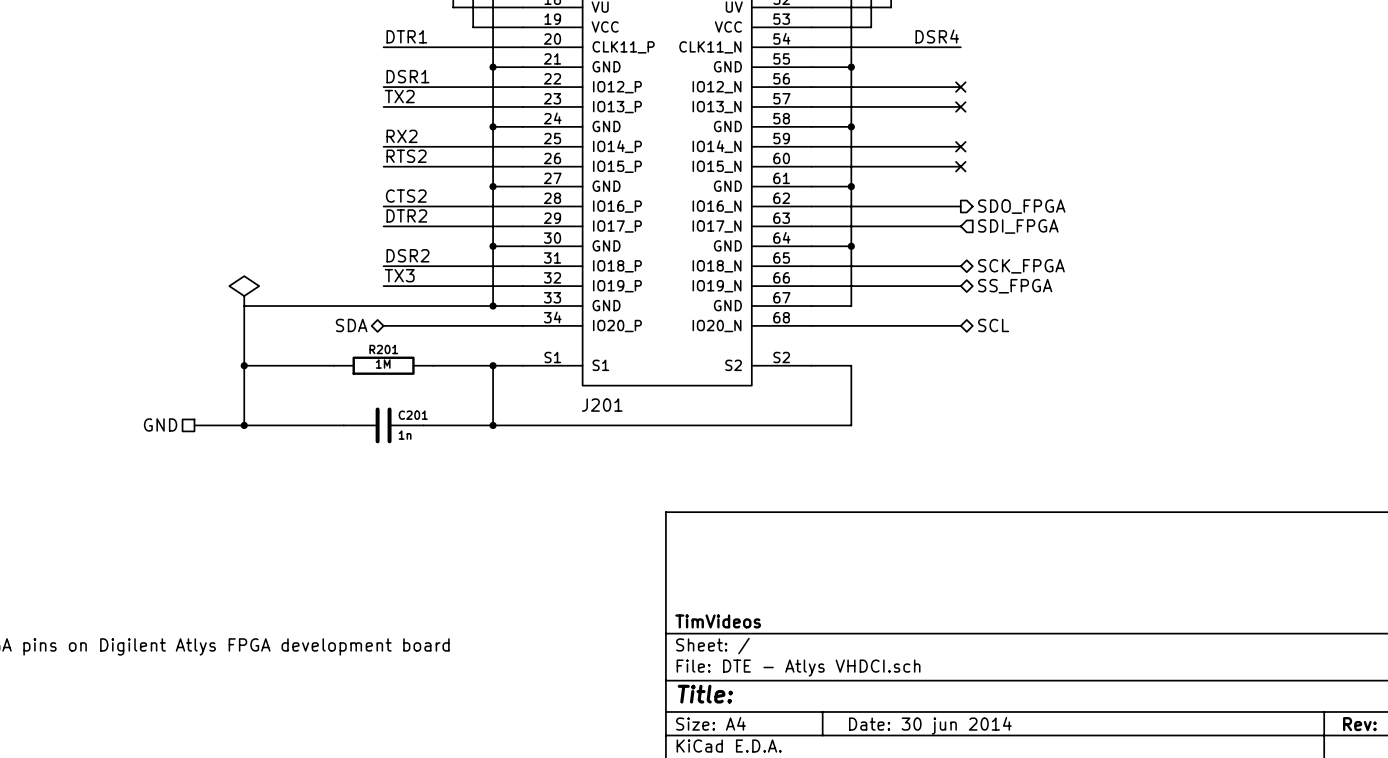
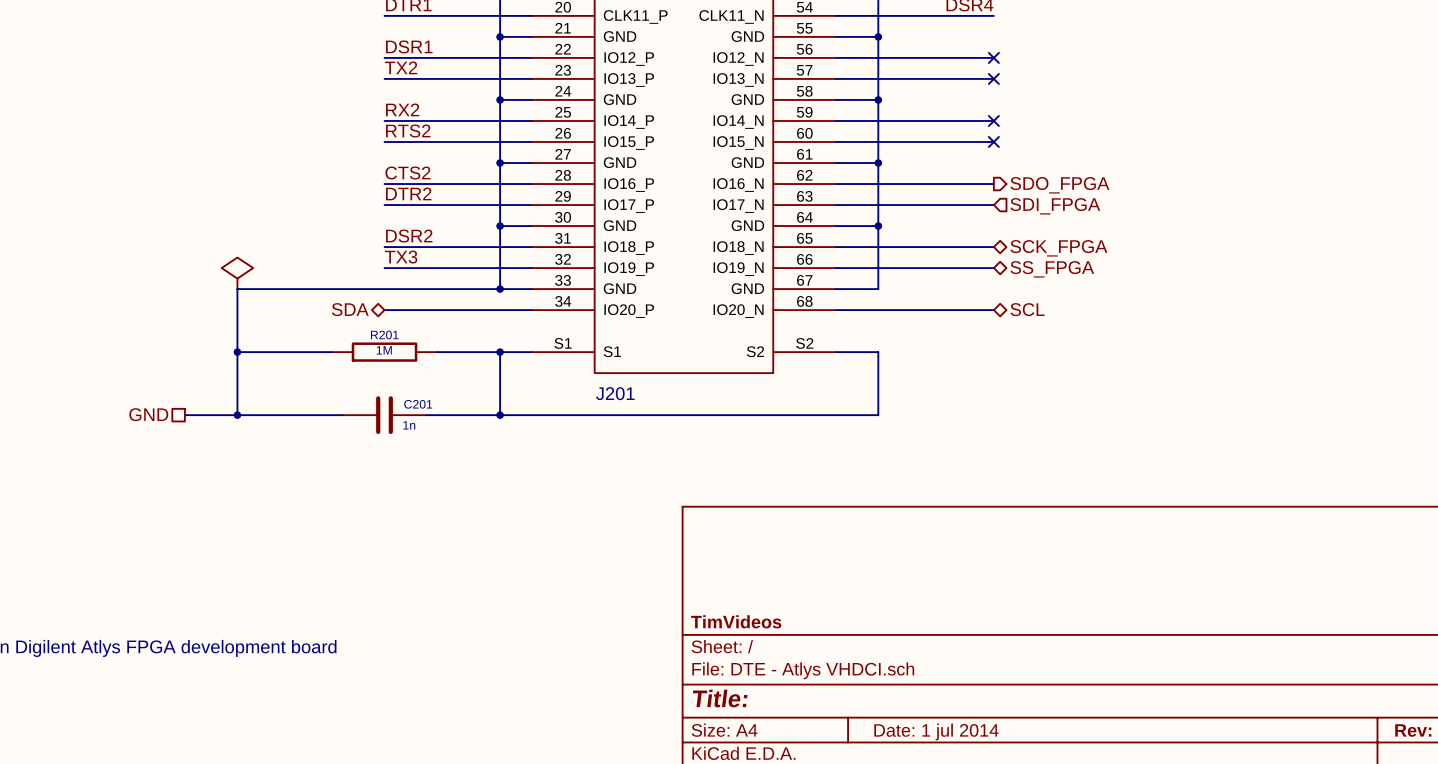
title block: Date: 30 jun 2014 (930, 725) -> Date: 1 jul 2014 (936, 731)

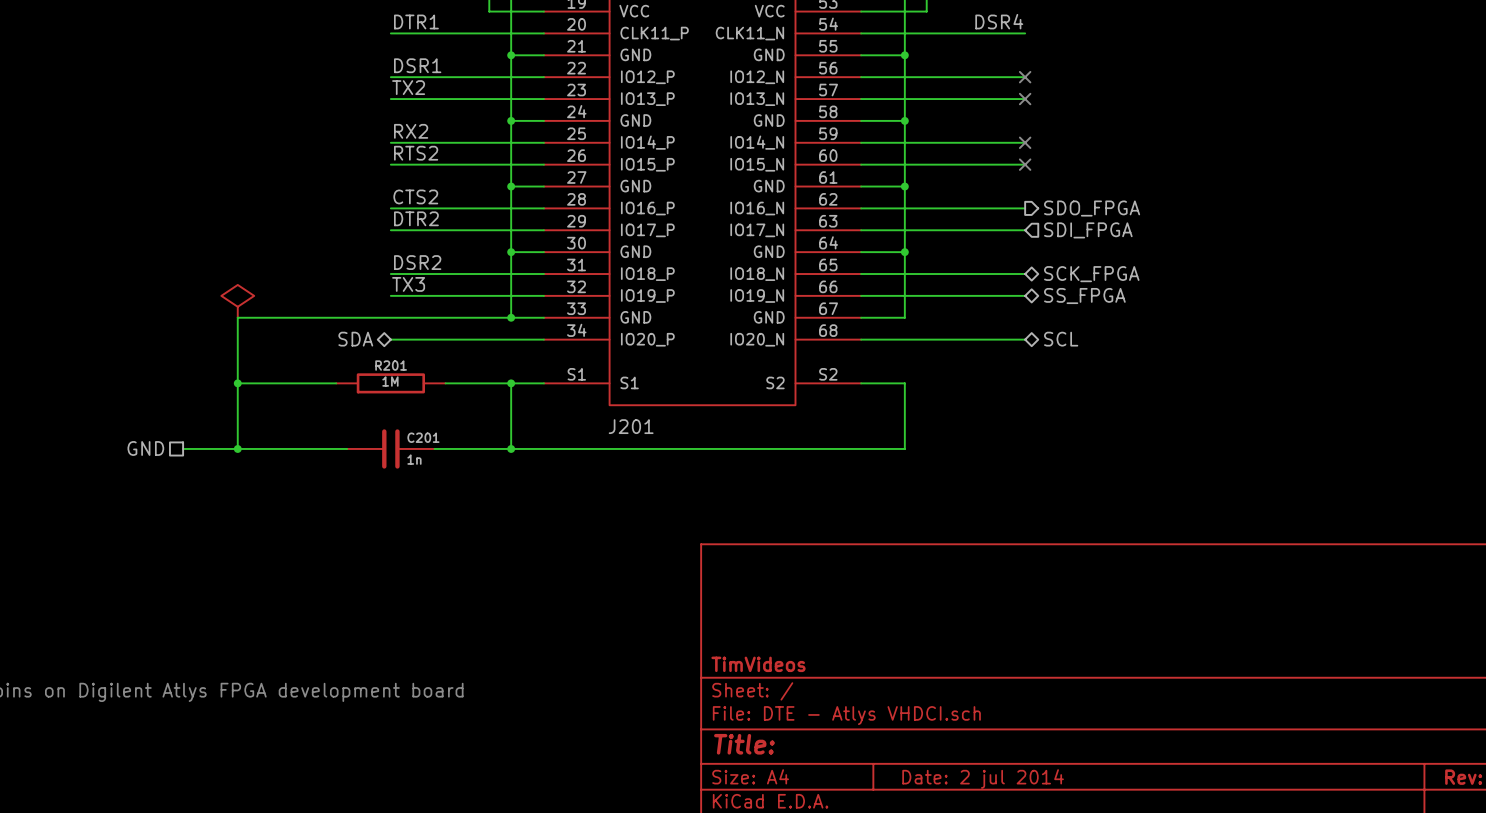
title block: Date: 1 jul 2014 (936, 731) -> Date: 2 jul 2014 (983, 778)

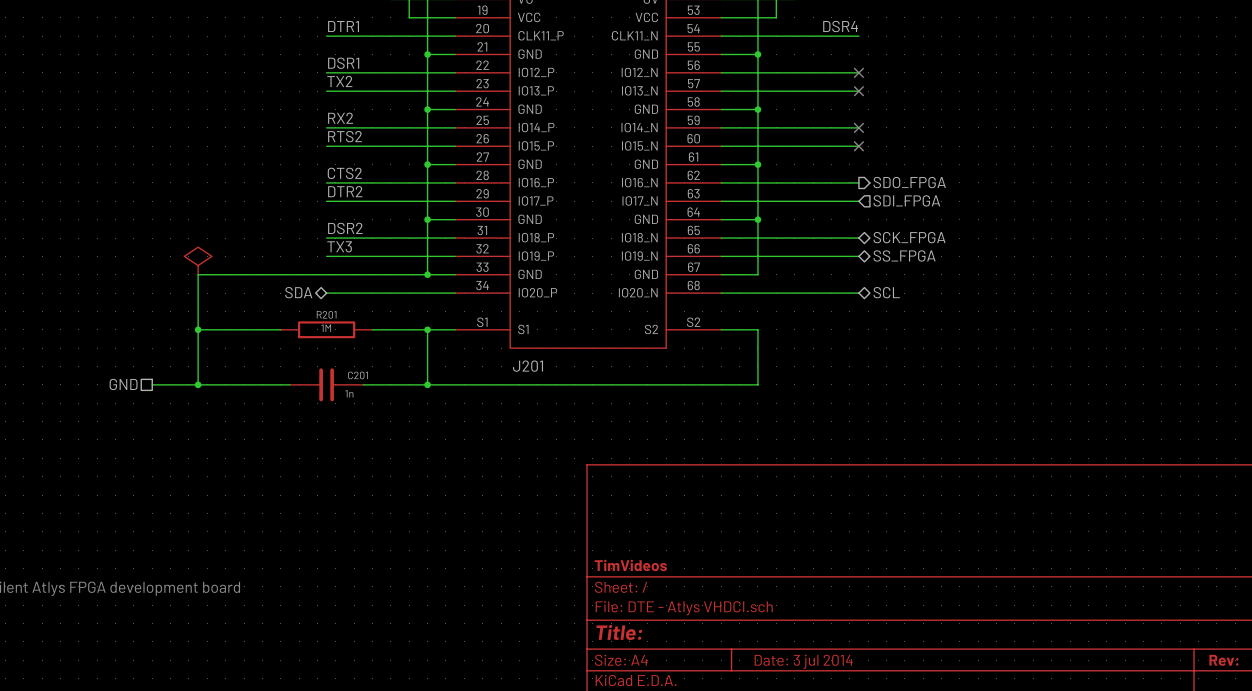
title block: Date: 2 jul 2014 (983, 778) -> Date: 3 jul 2014 (803, 661)

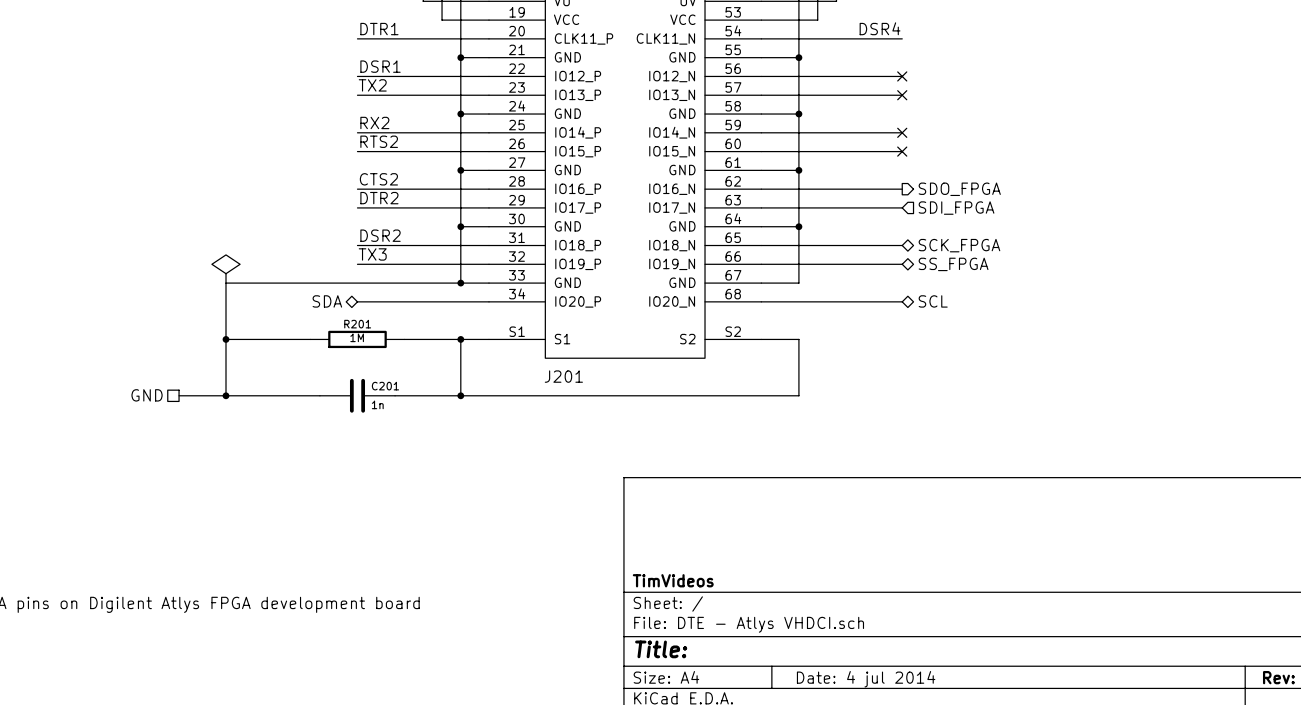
title block: Date: 3 jul 2014 (803, 661) -> Date: 4 jul 2014 (866, 679)

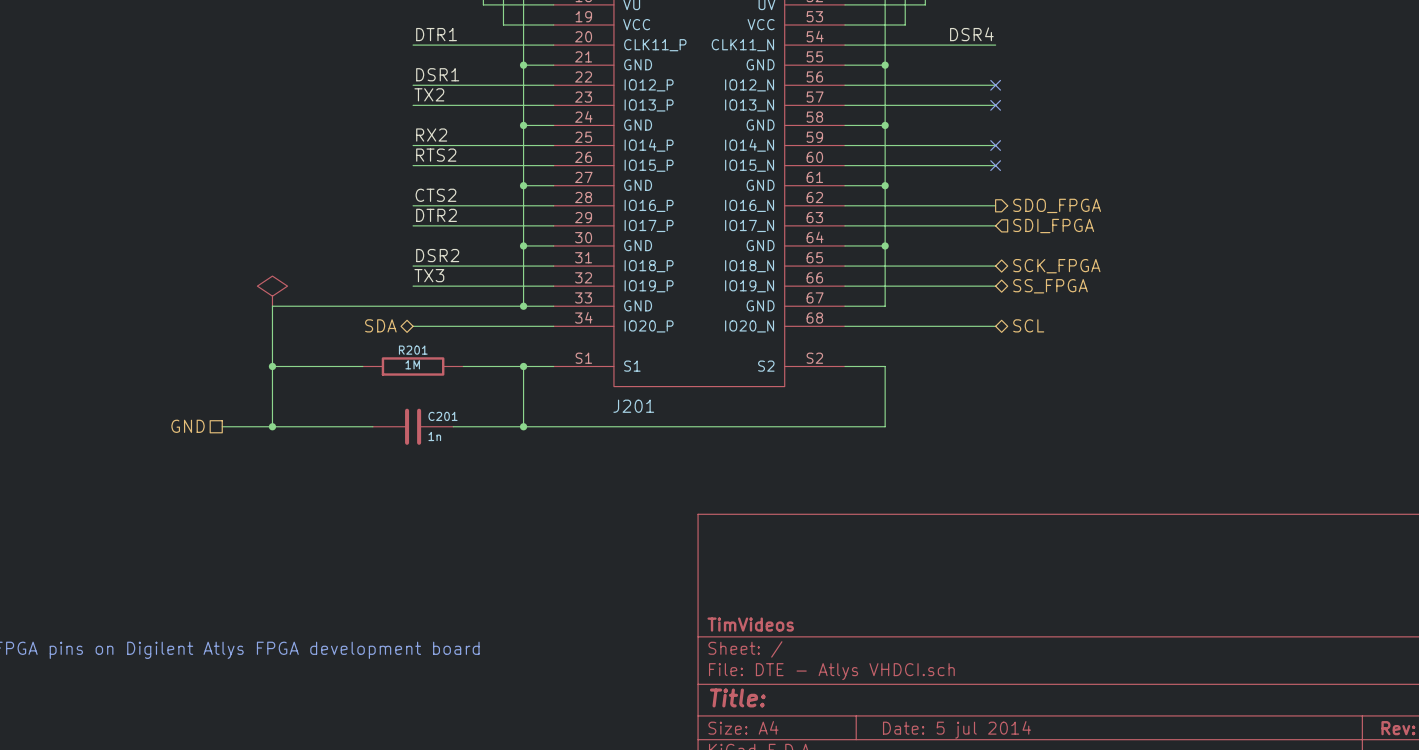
title block: Date: 4 jul 2014 (866, 679) -> Date: 5 jul 2014 (956, 729)

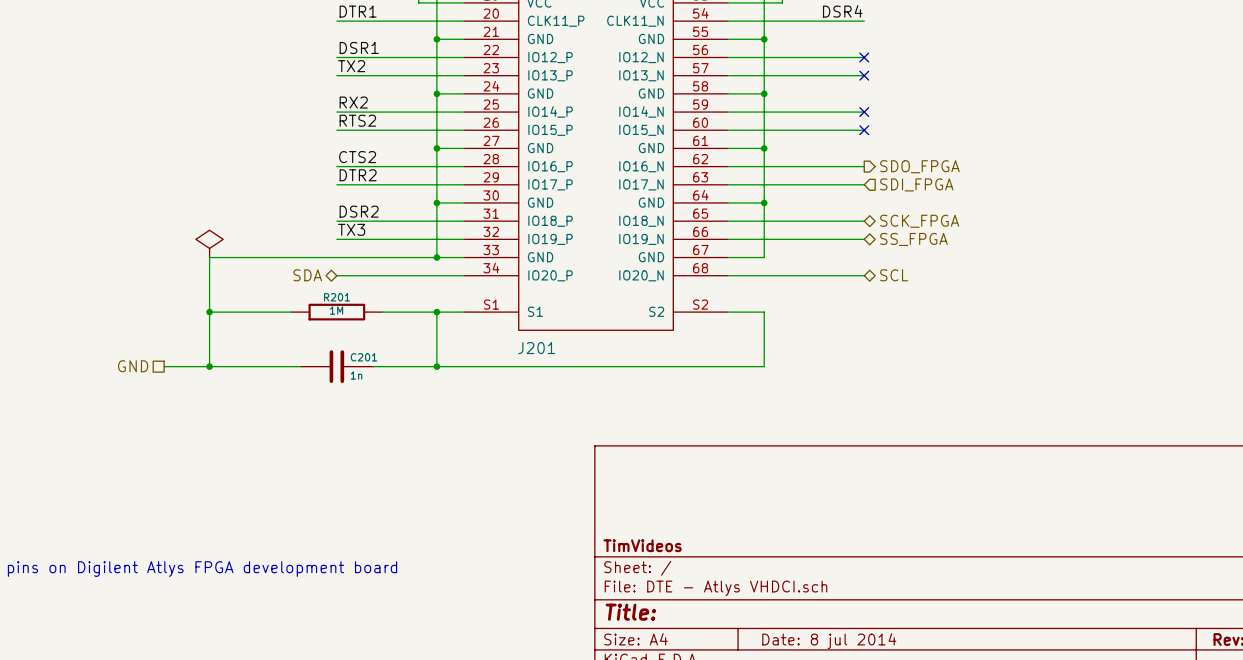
title block: Date: 5 jul 2014 (956, 729) -> Date: 8 jul 2014 (829, 641)

